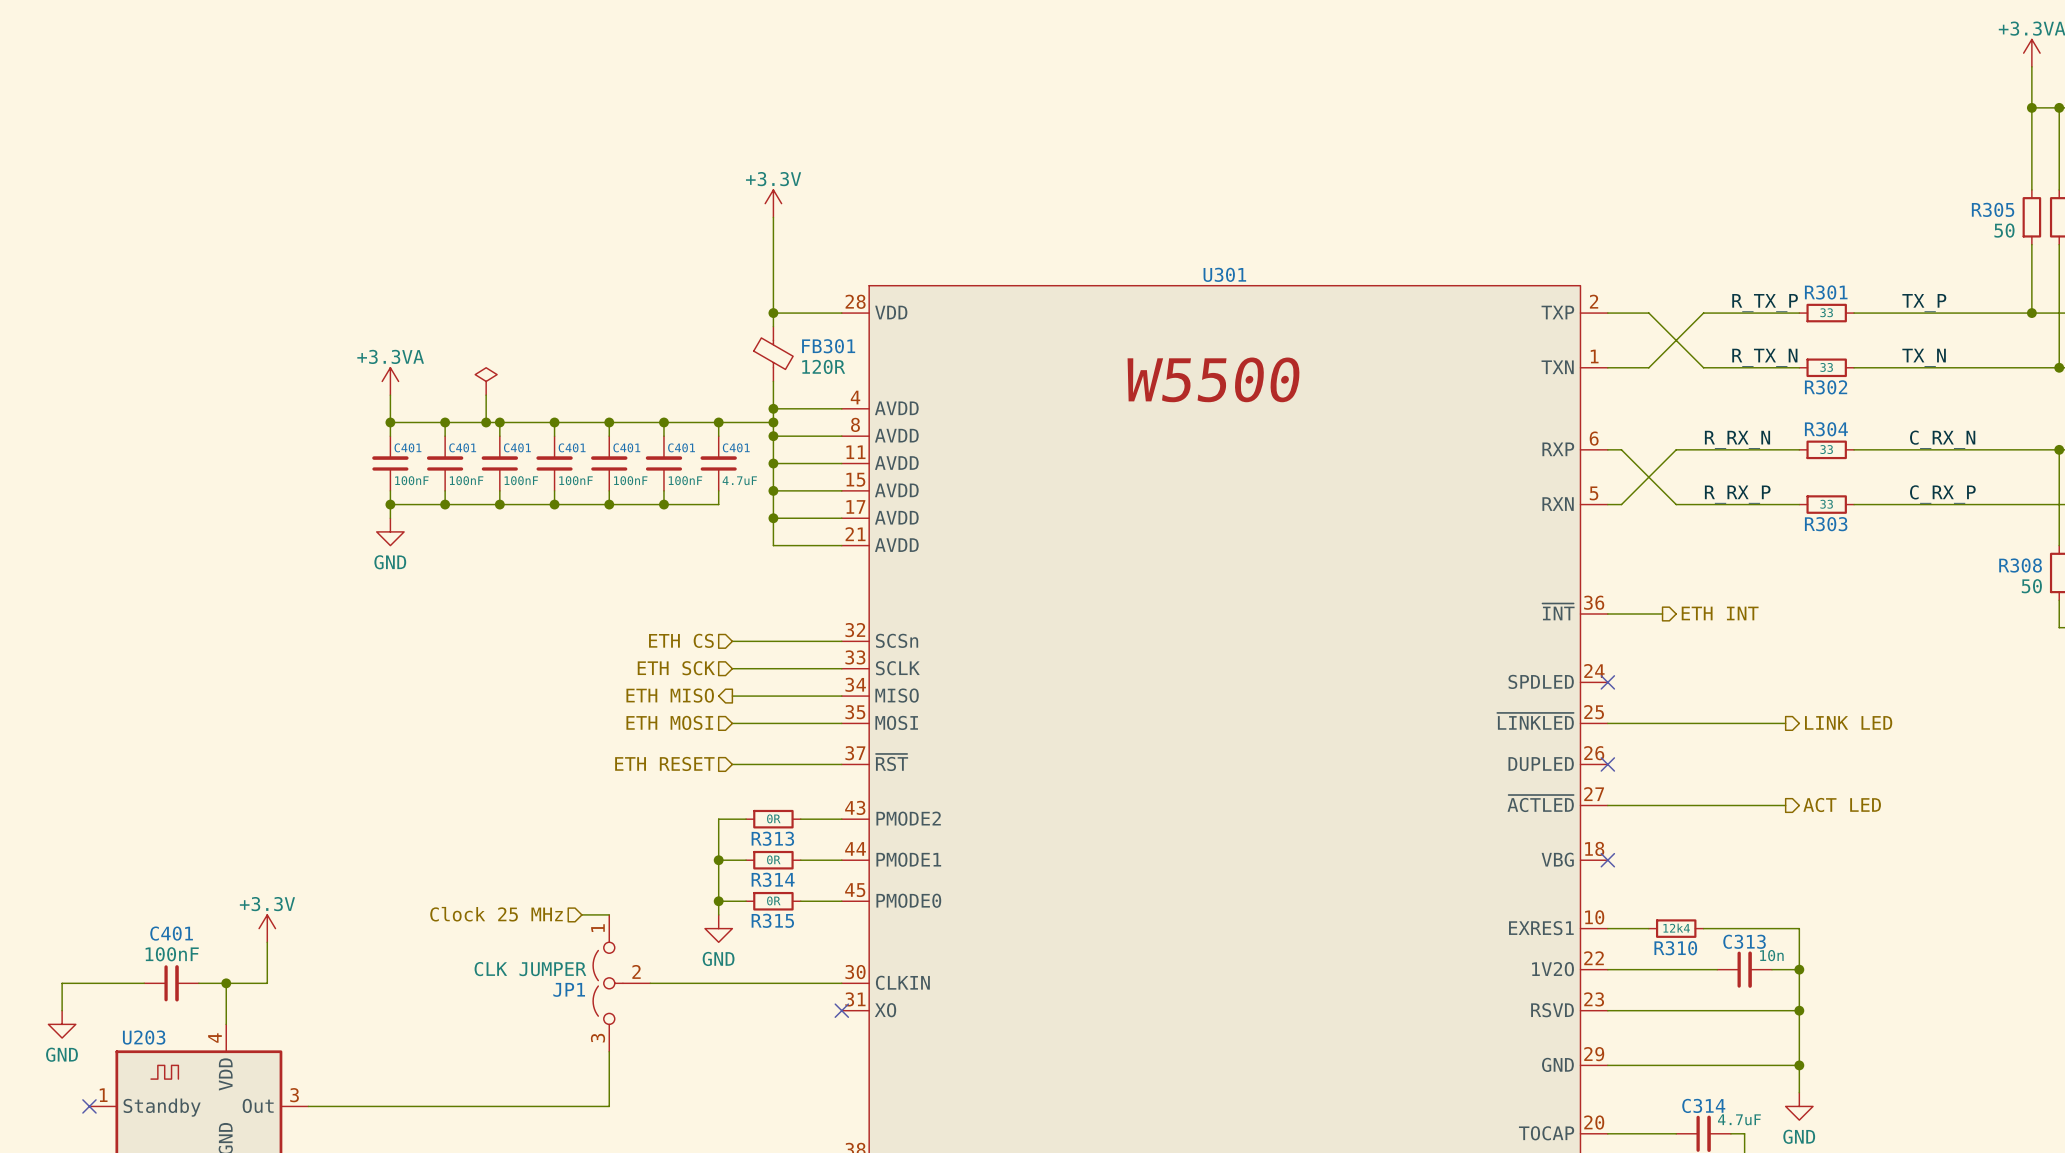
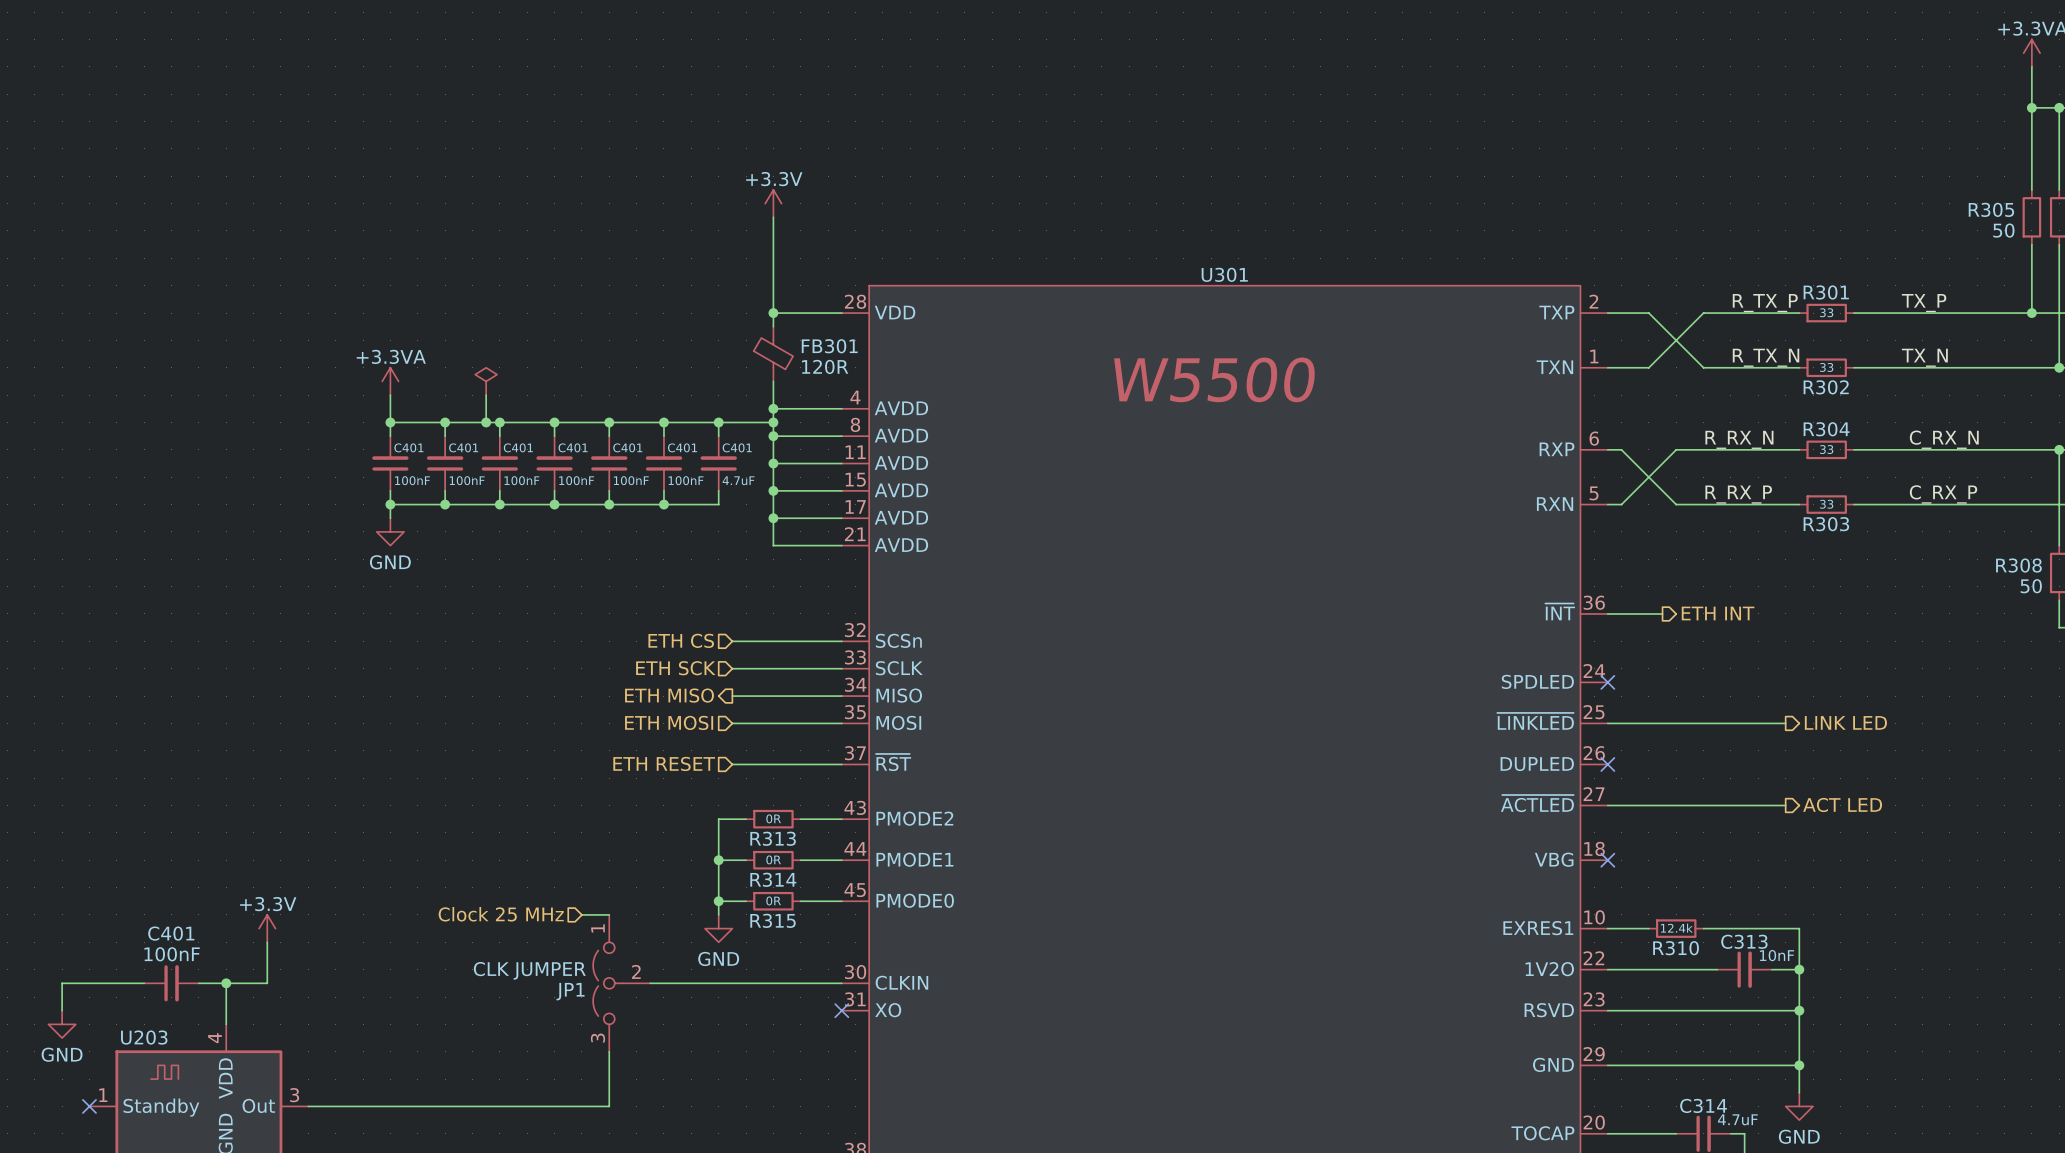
R310 value: 12k4 (1676, 928) -> 12.4k (1676, 928)
C313 value: 10n (1771, 955) -> 10nF (1777, 955)

